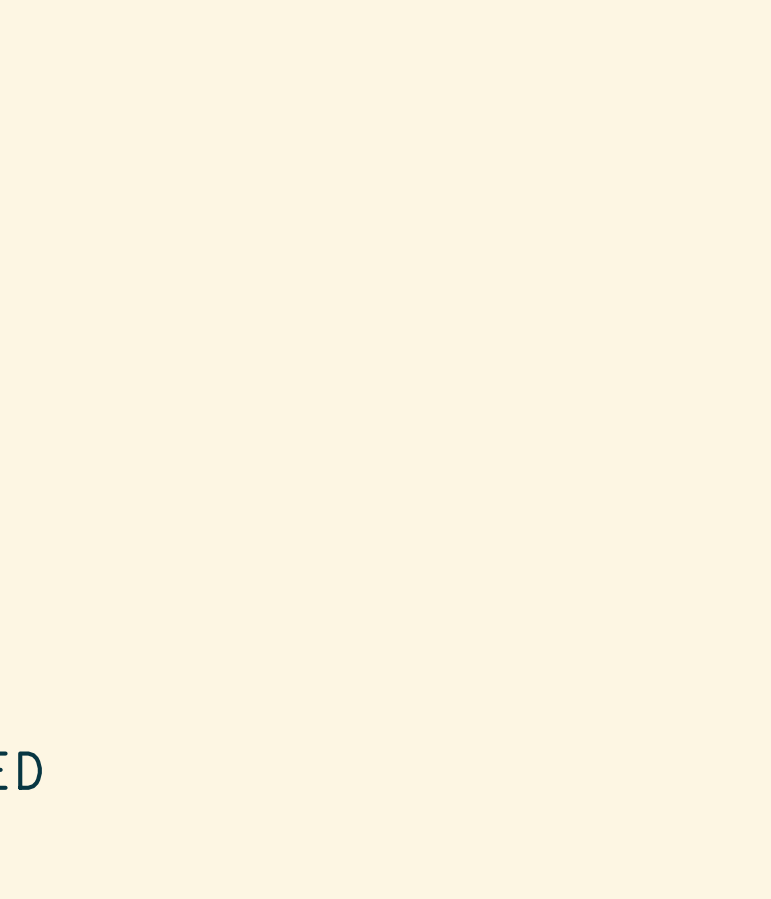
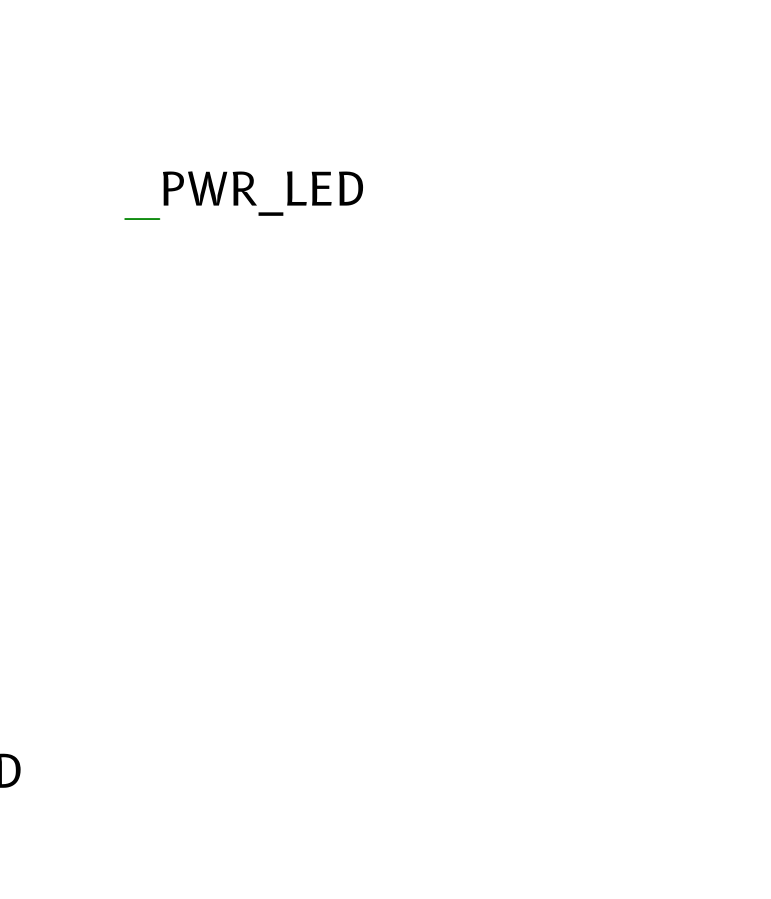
label: none -> PWR_LED (263, 193)
wire: none -> (125, 219) (159, 219)

